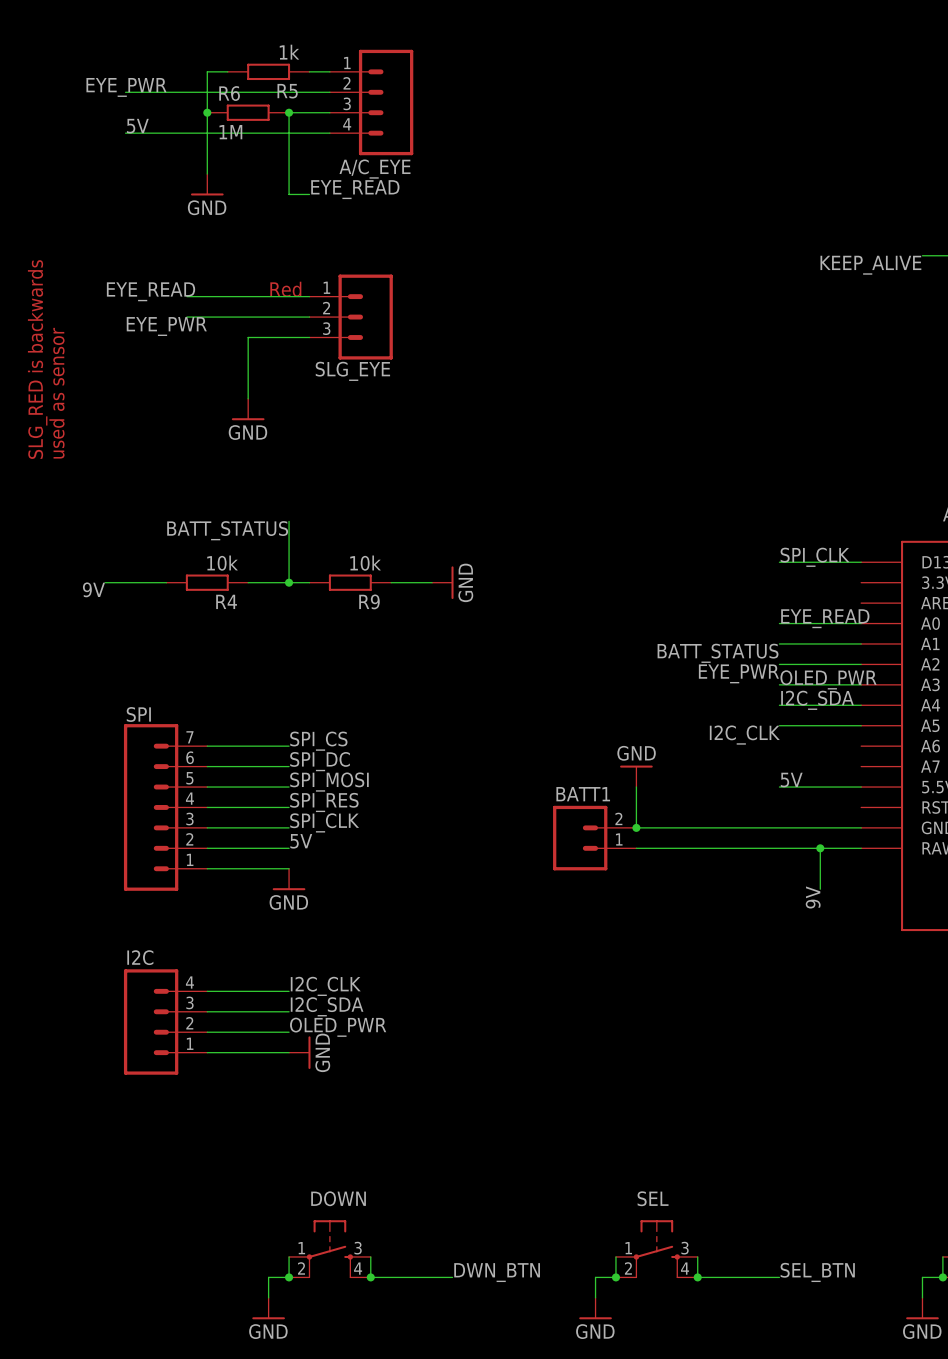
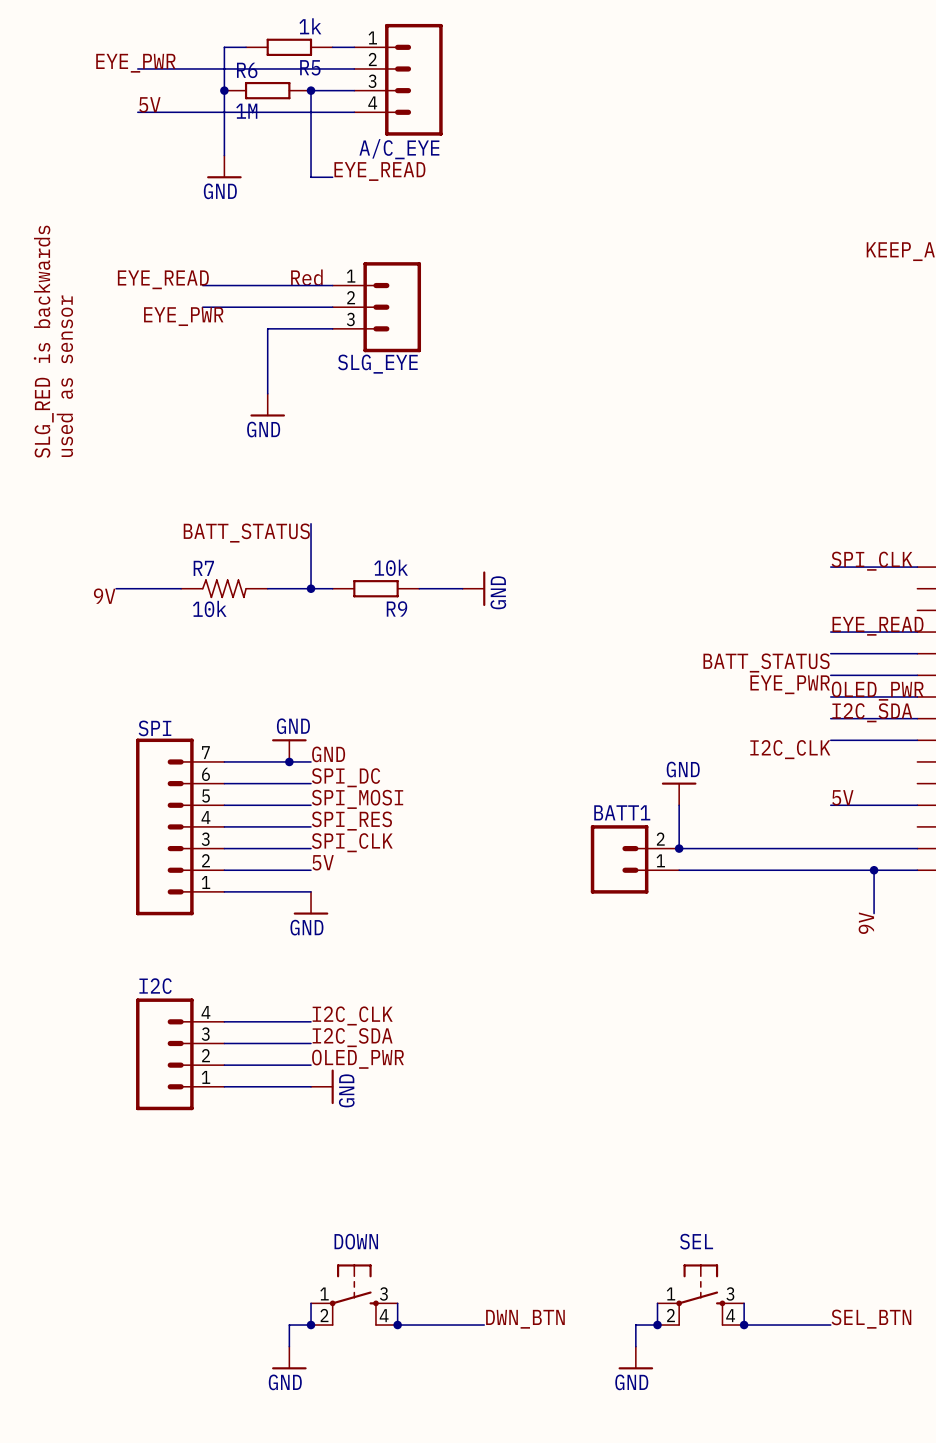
R4: 10k (207, 582) -> none
R7: none -> 10k (224, 588)
power symbol: none -> GND (289, 750)
label: SPI_CS (318, 741) -> GND (328, 754)
junction: none -> (289, 761)

